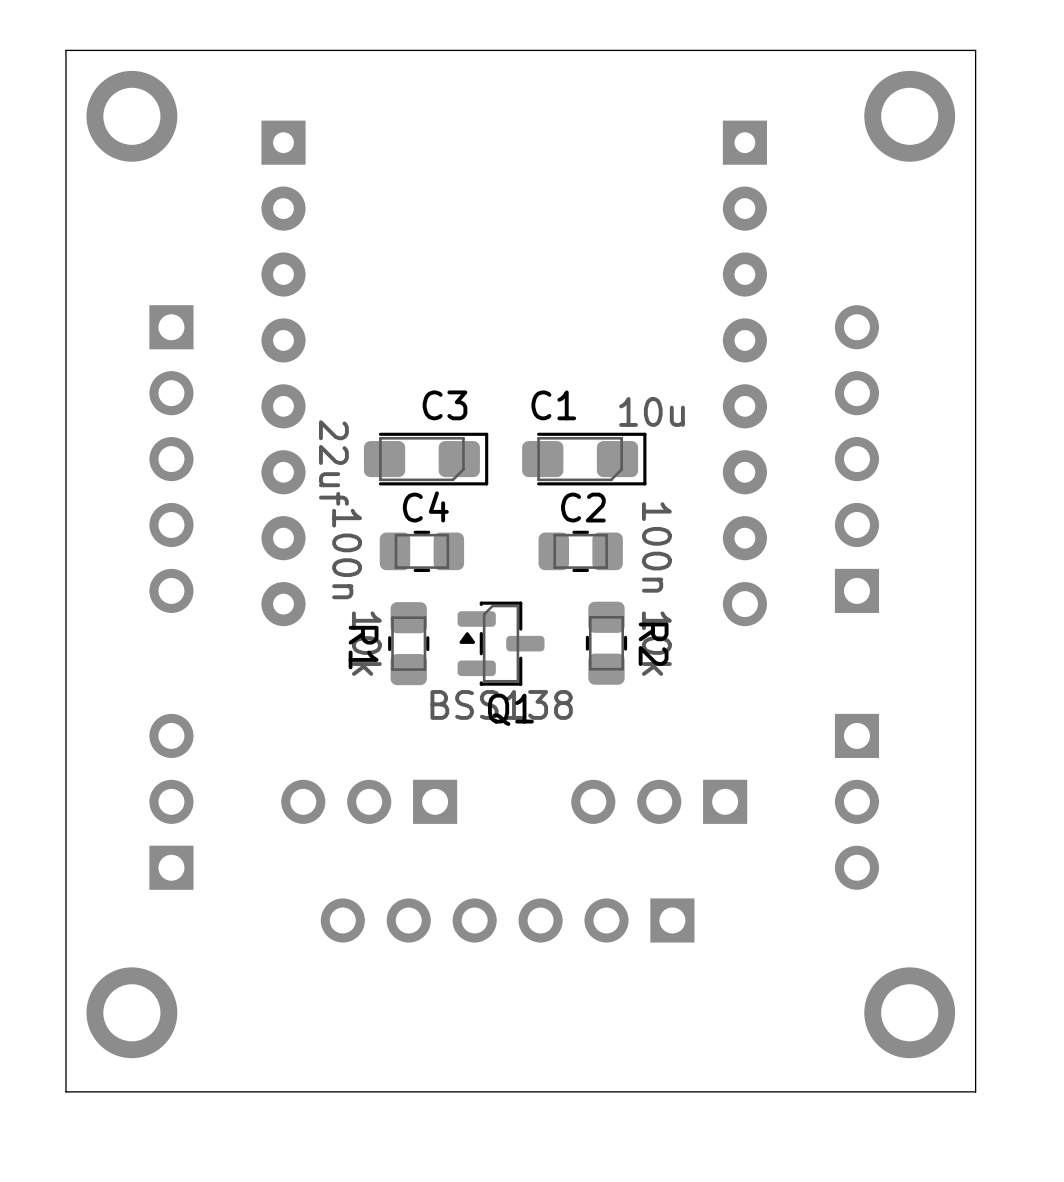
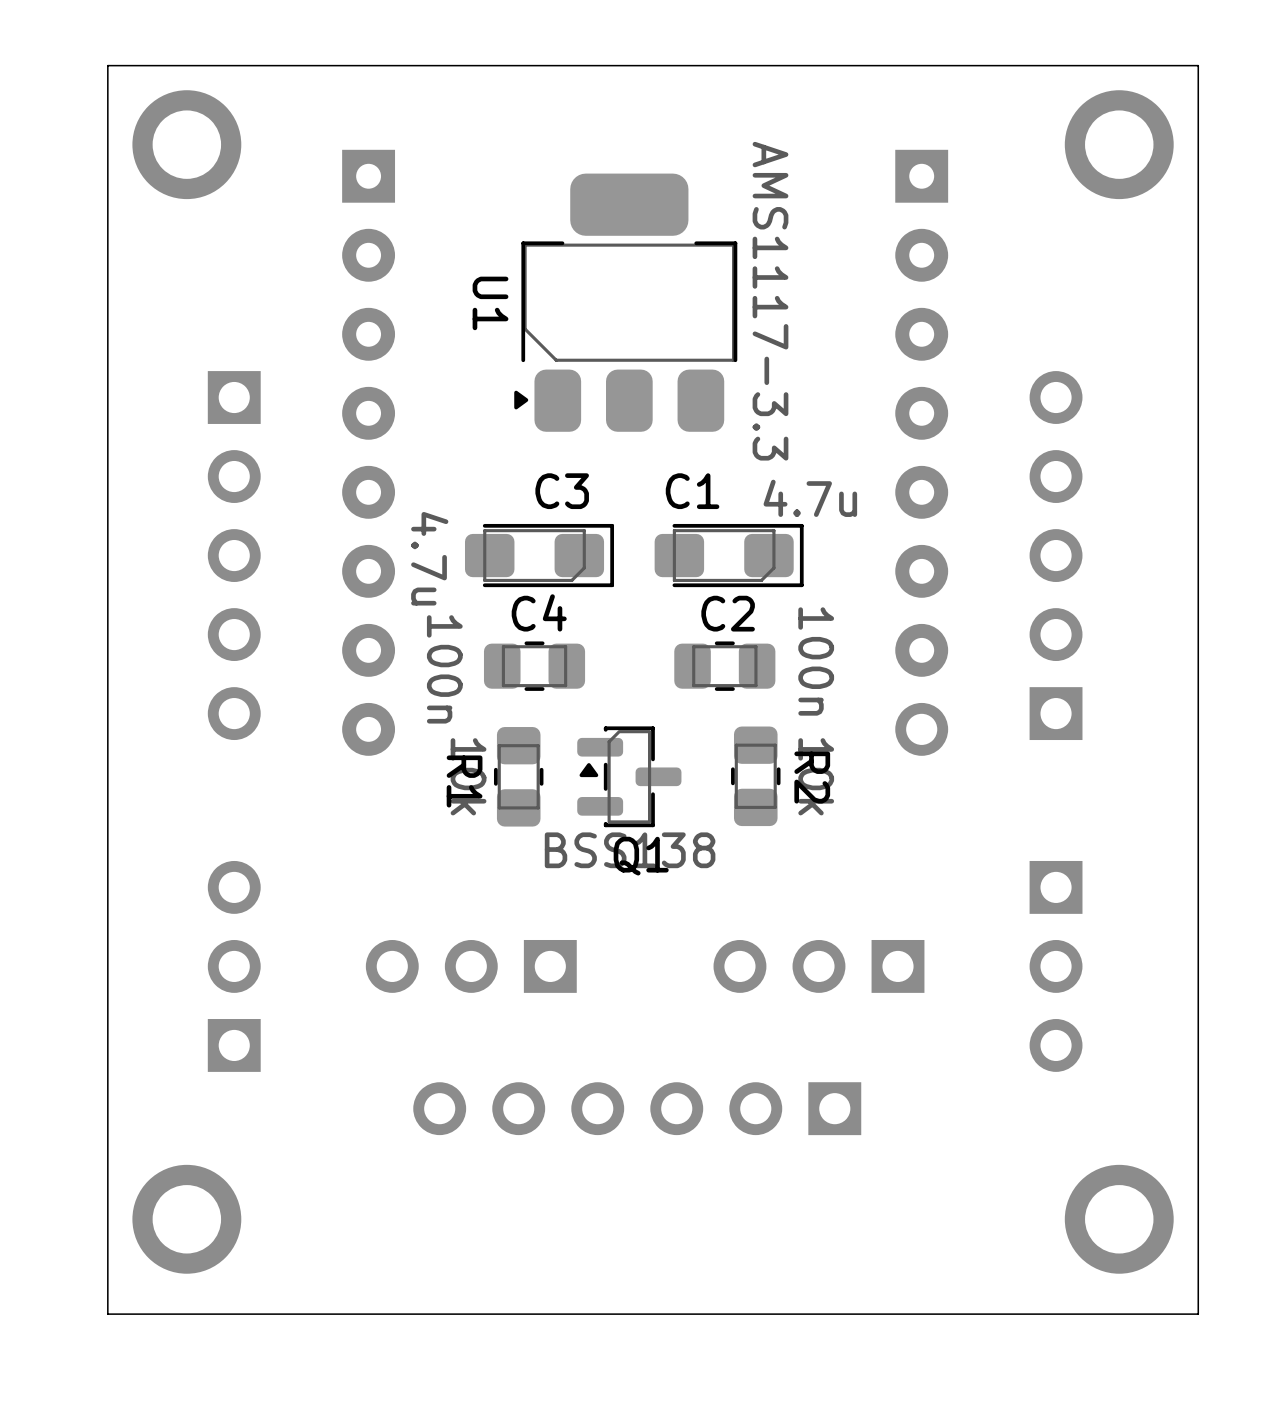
U1: none -> AMS1117-3.3 (625, 302)
C1 value: 10u (652, 411) -> 4.7u (810, 498)
C3 value: 22uf (333, 462) -> 4.7u (429, 558)

